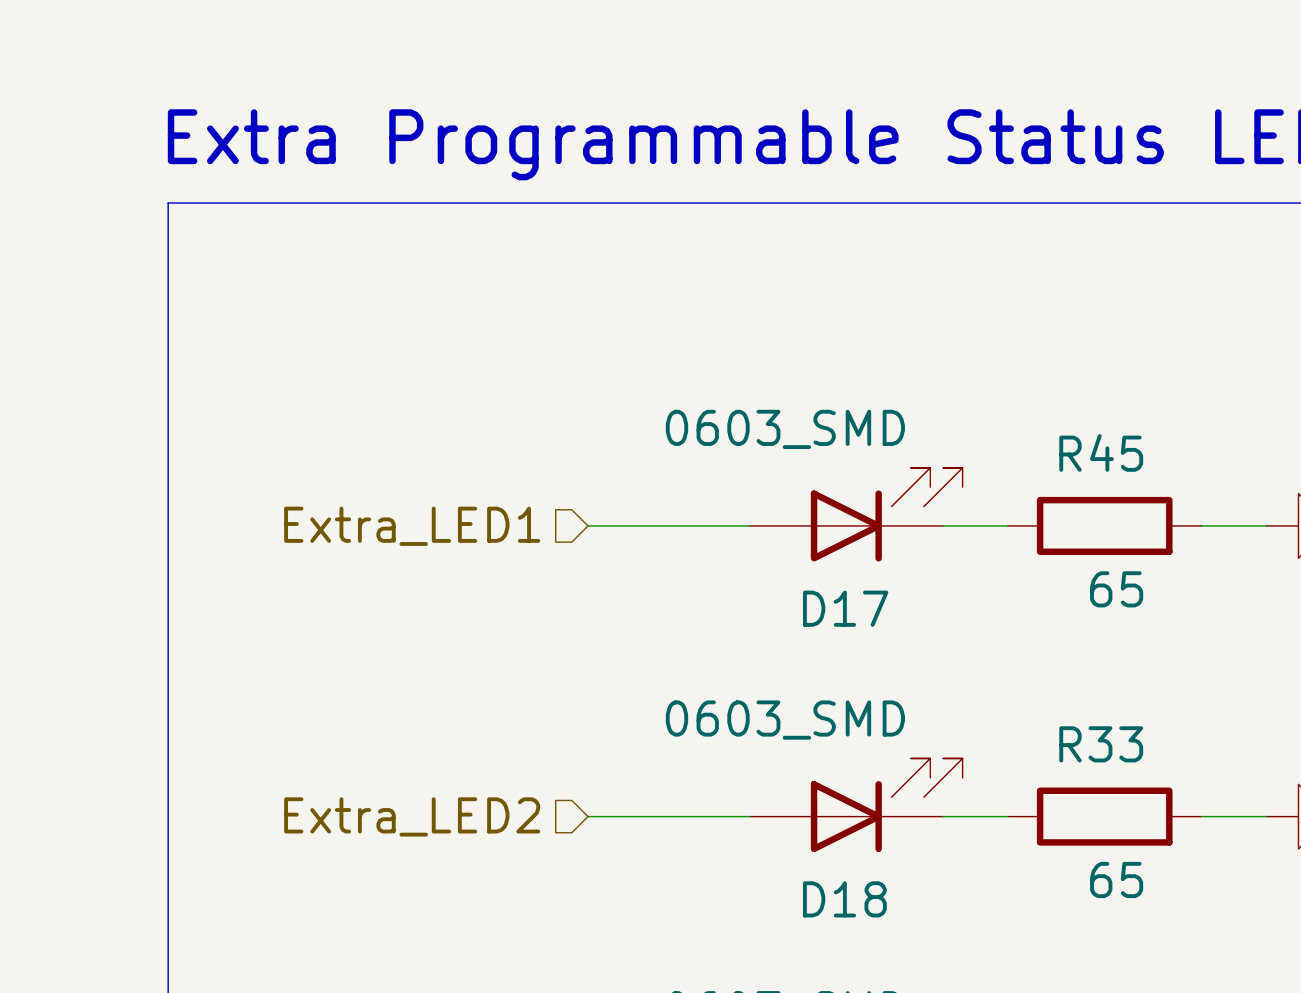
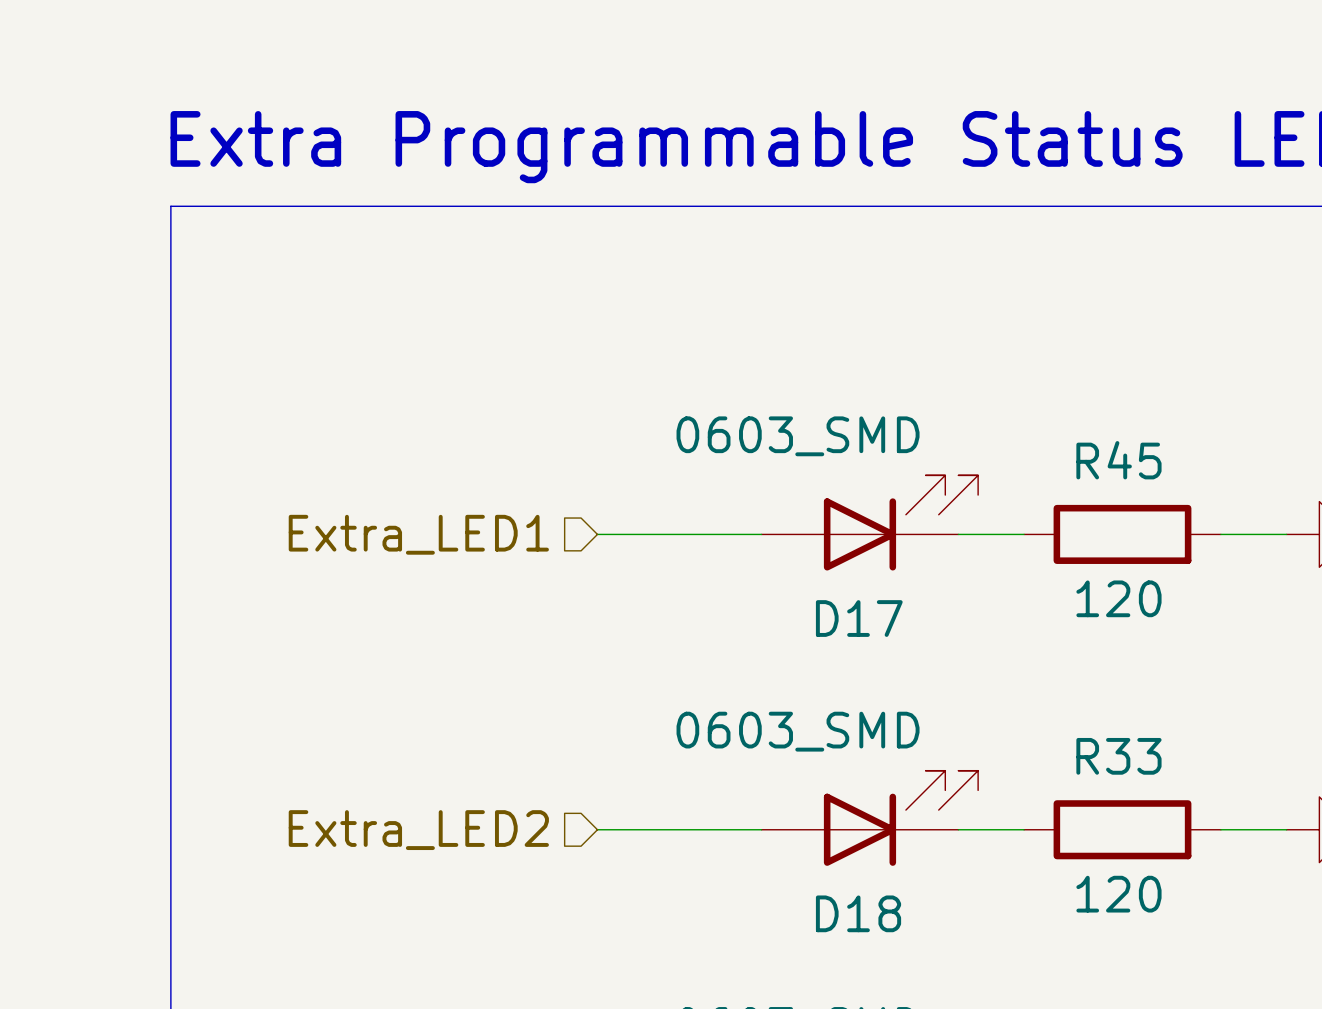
R45 value: 65 (1116, 589) -> 120 (1118, 598)
R33 value: 65 (1116, 879) -> 120 (1118, 894)

